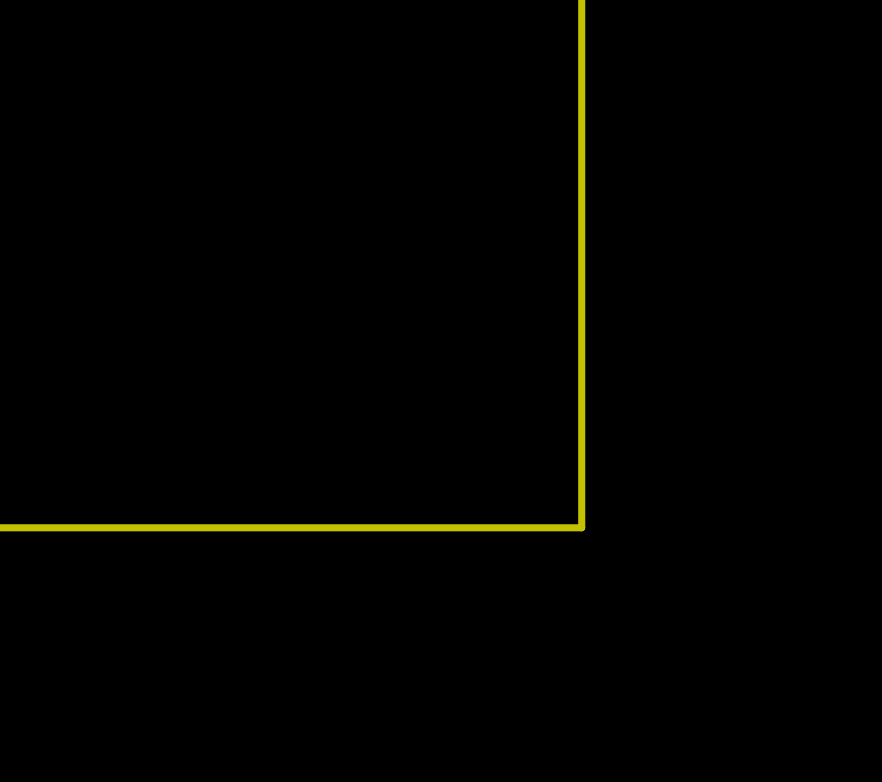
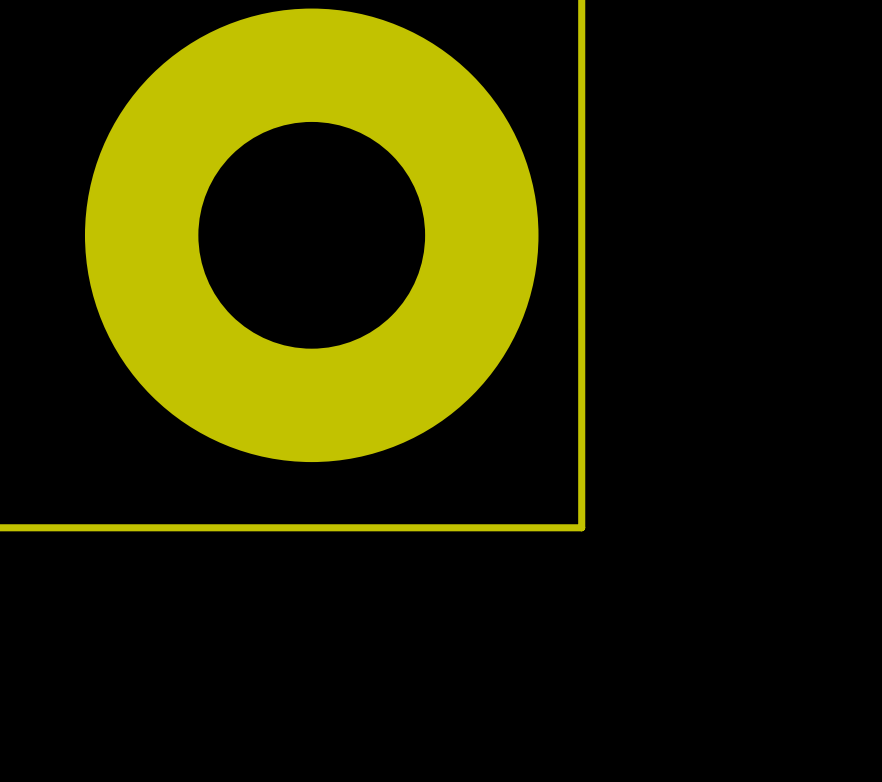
part: none -> (311, 235)

